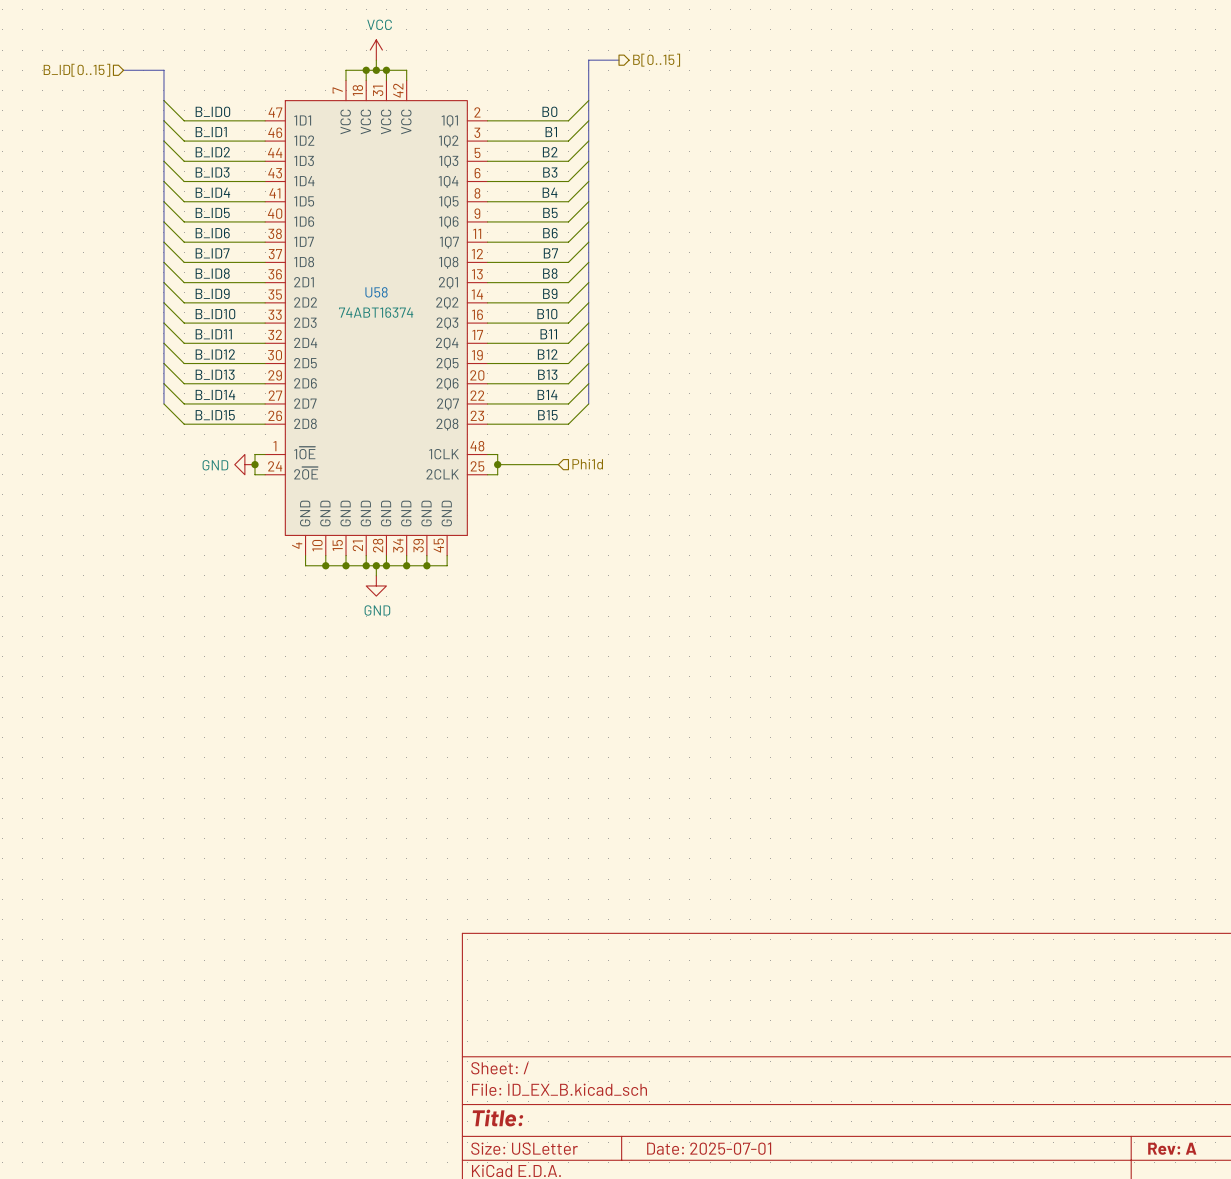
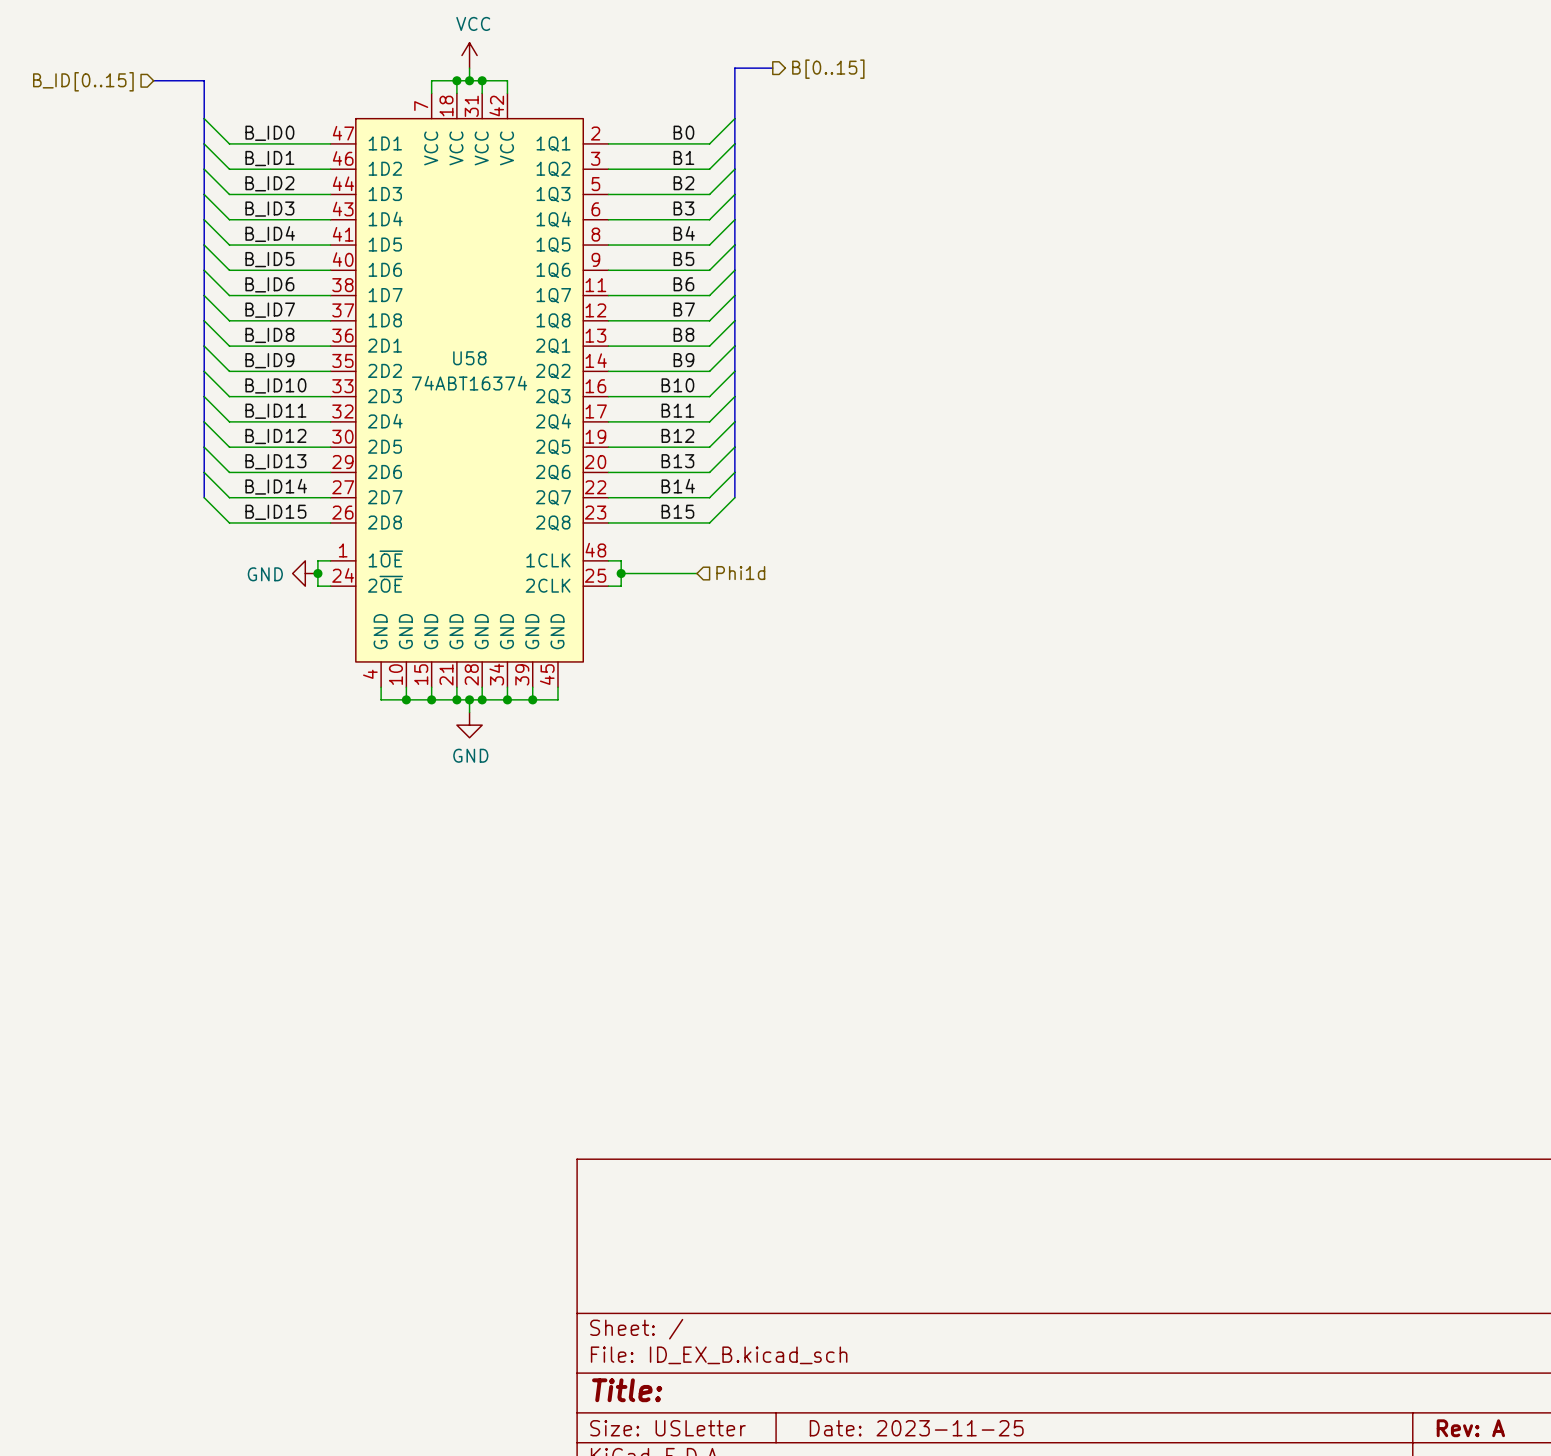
title block: Date: 2025-07-01 (709, 1148) -> Date: 2023-11-25 (916, 1428)

